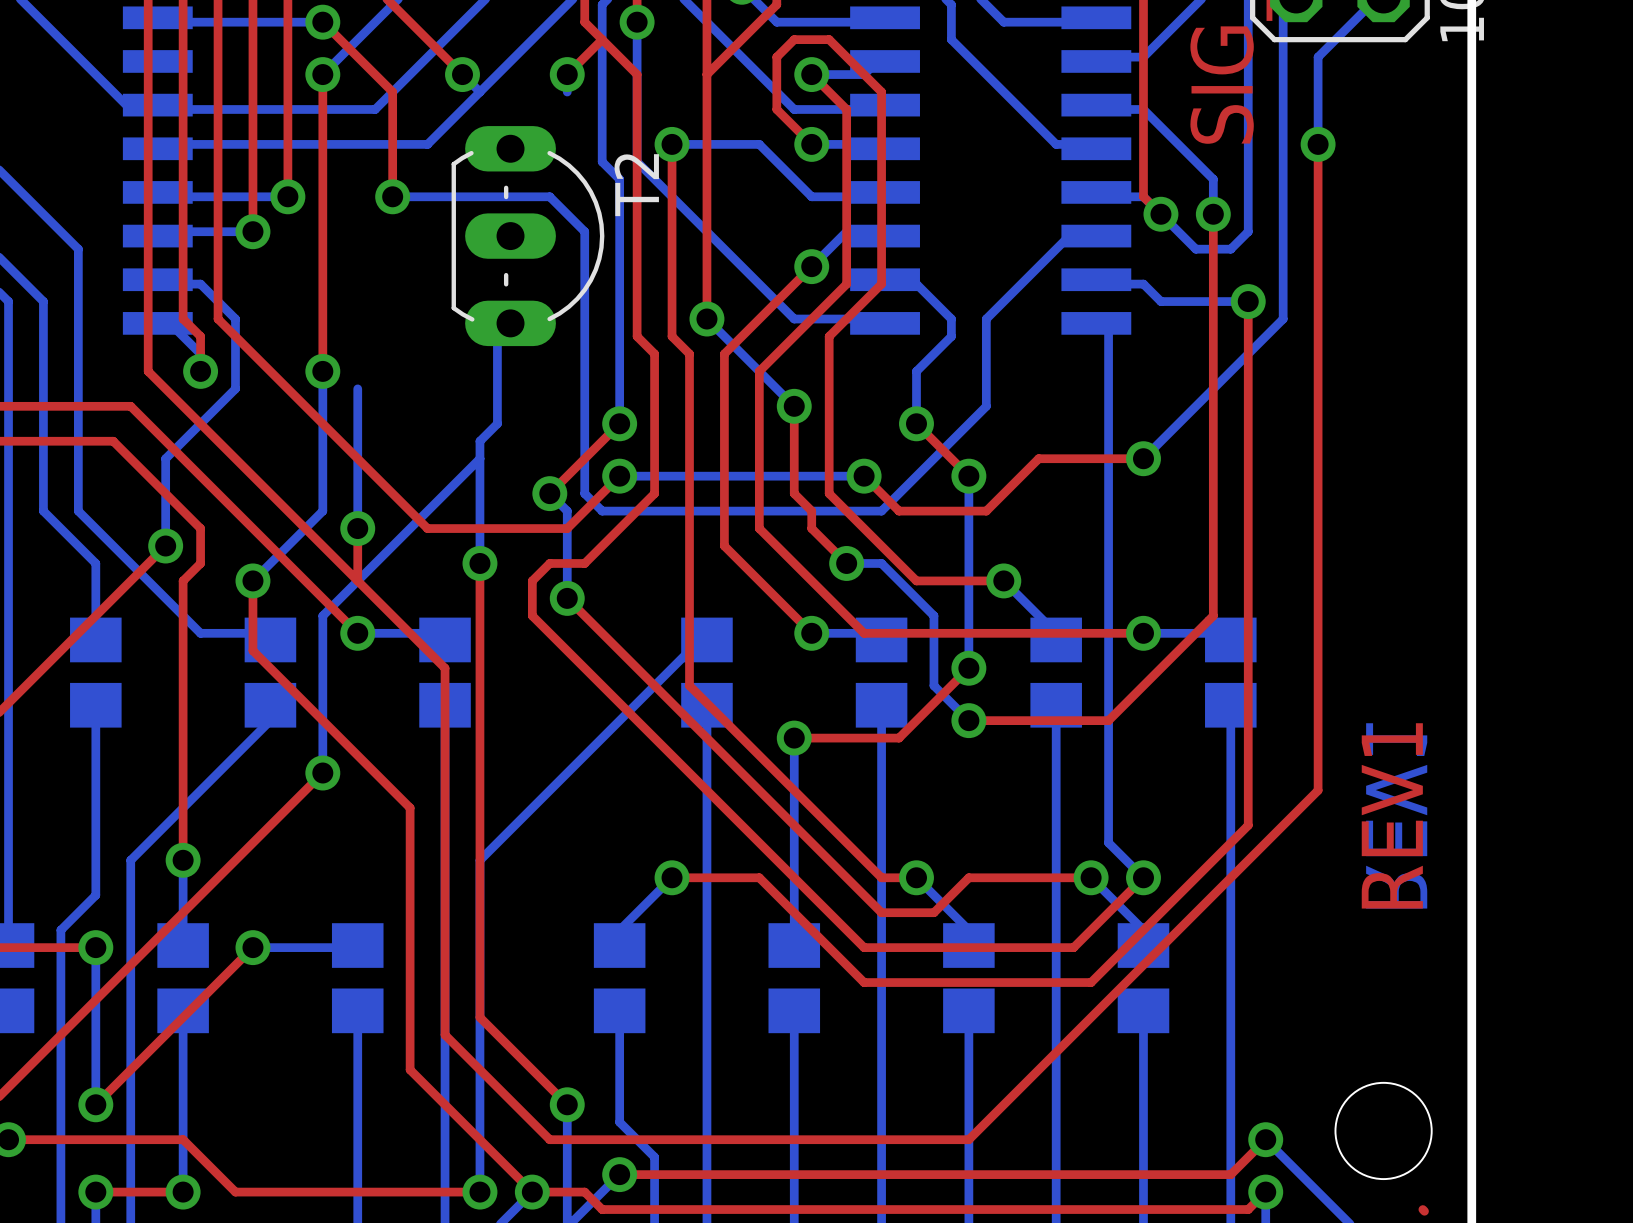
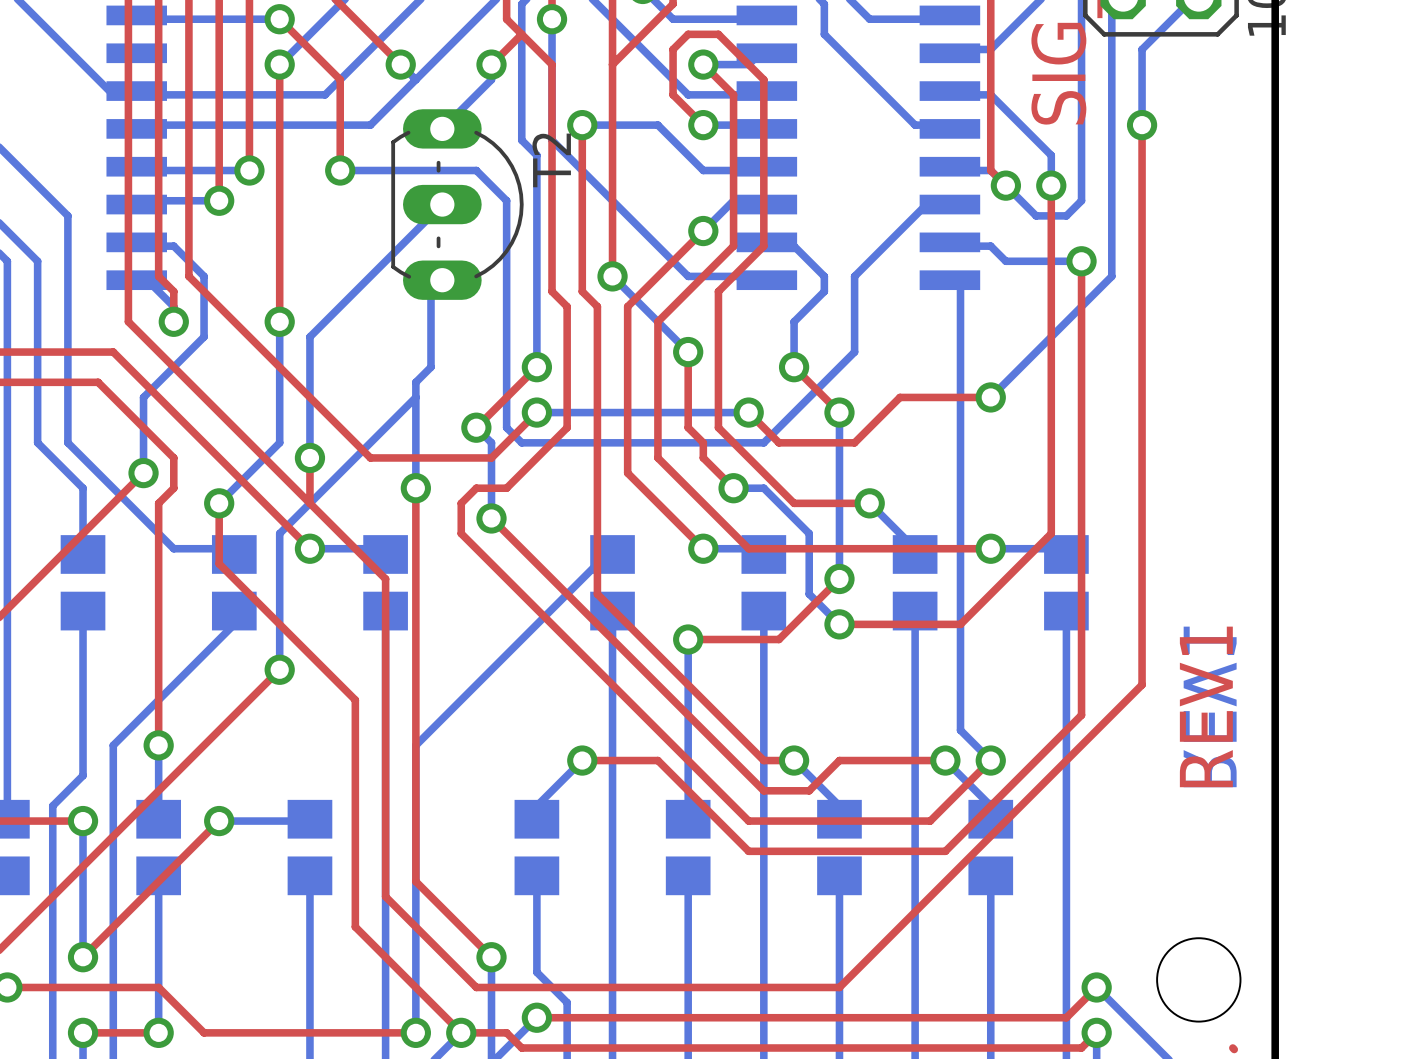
bottom track: none -> (491, 79) (442, 128)
bottom track: none -> (442, 204) (309, 336)

